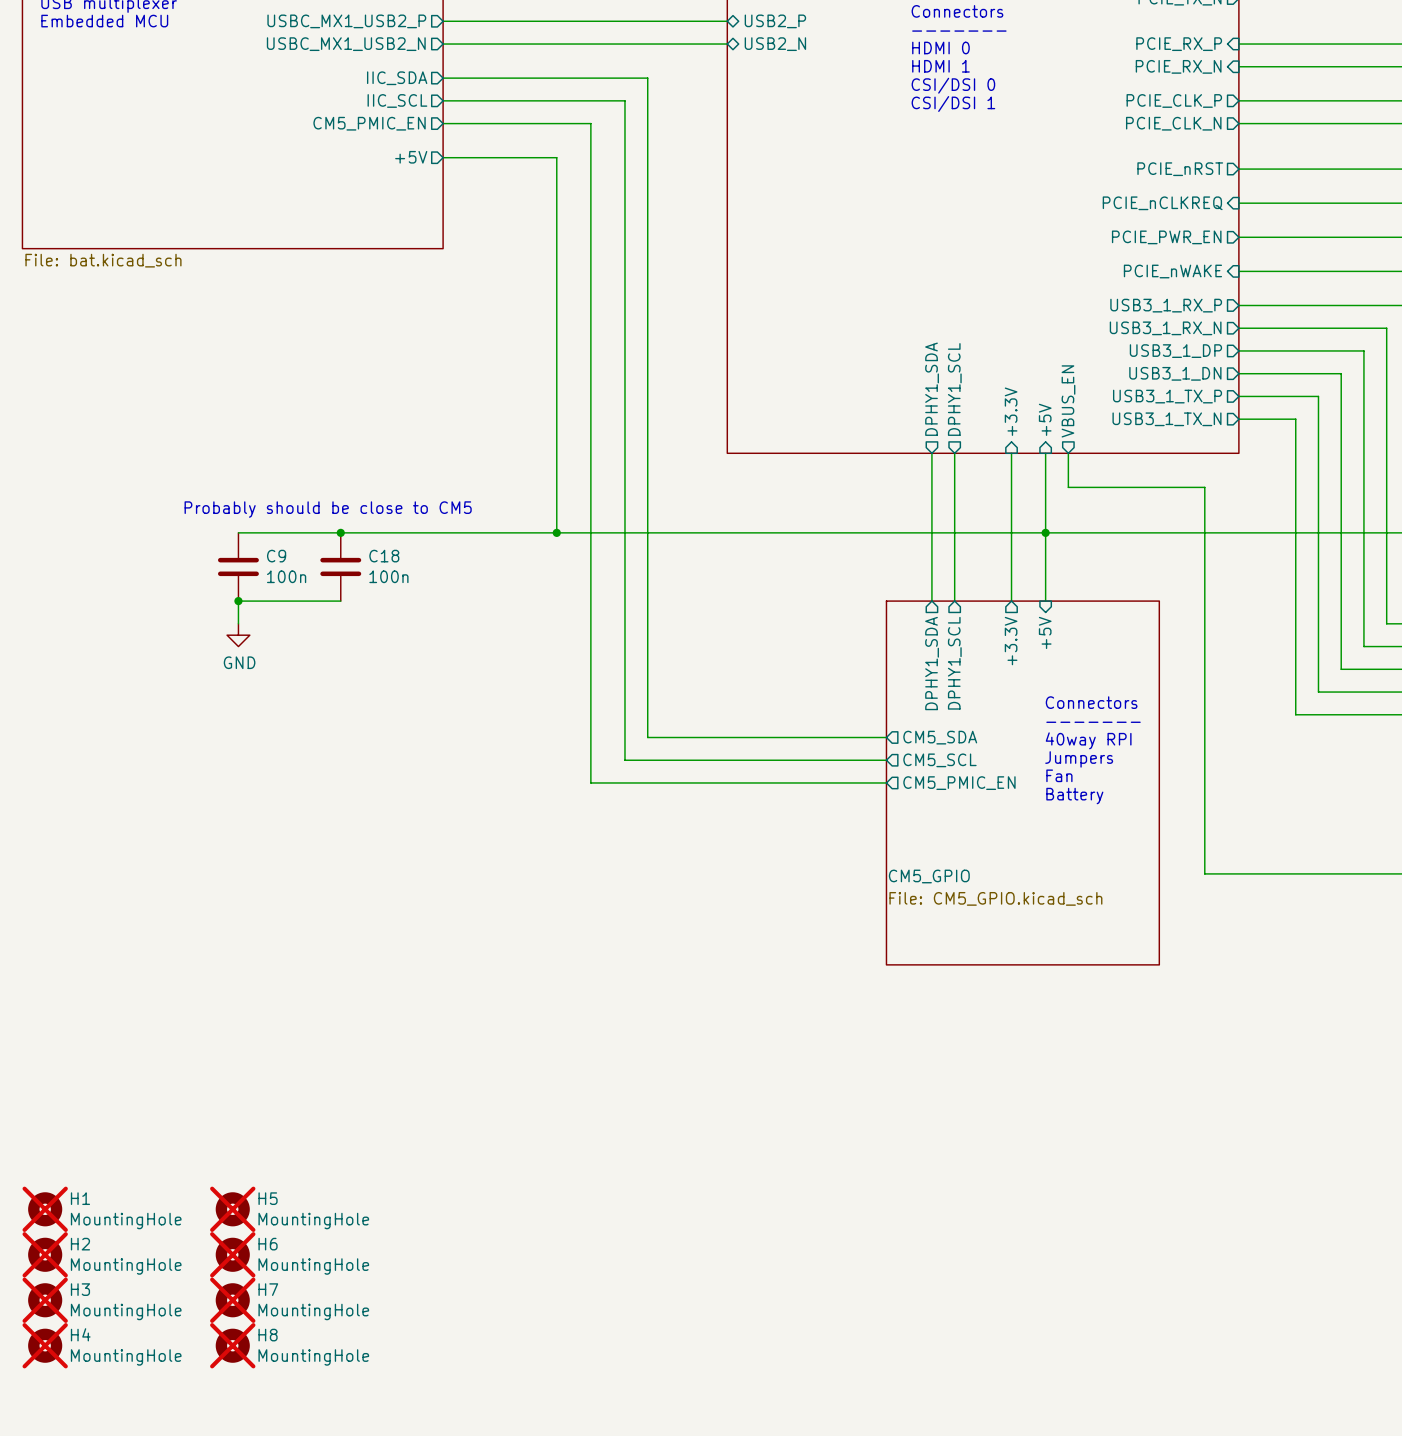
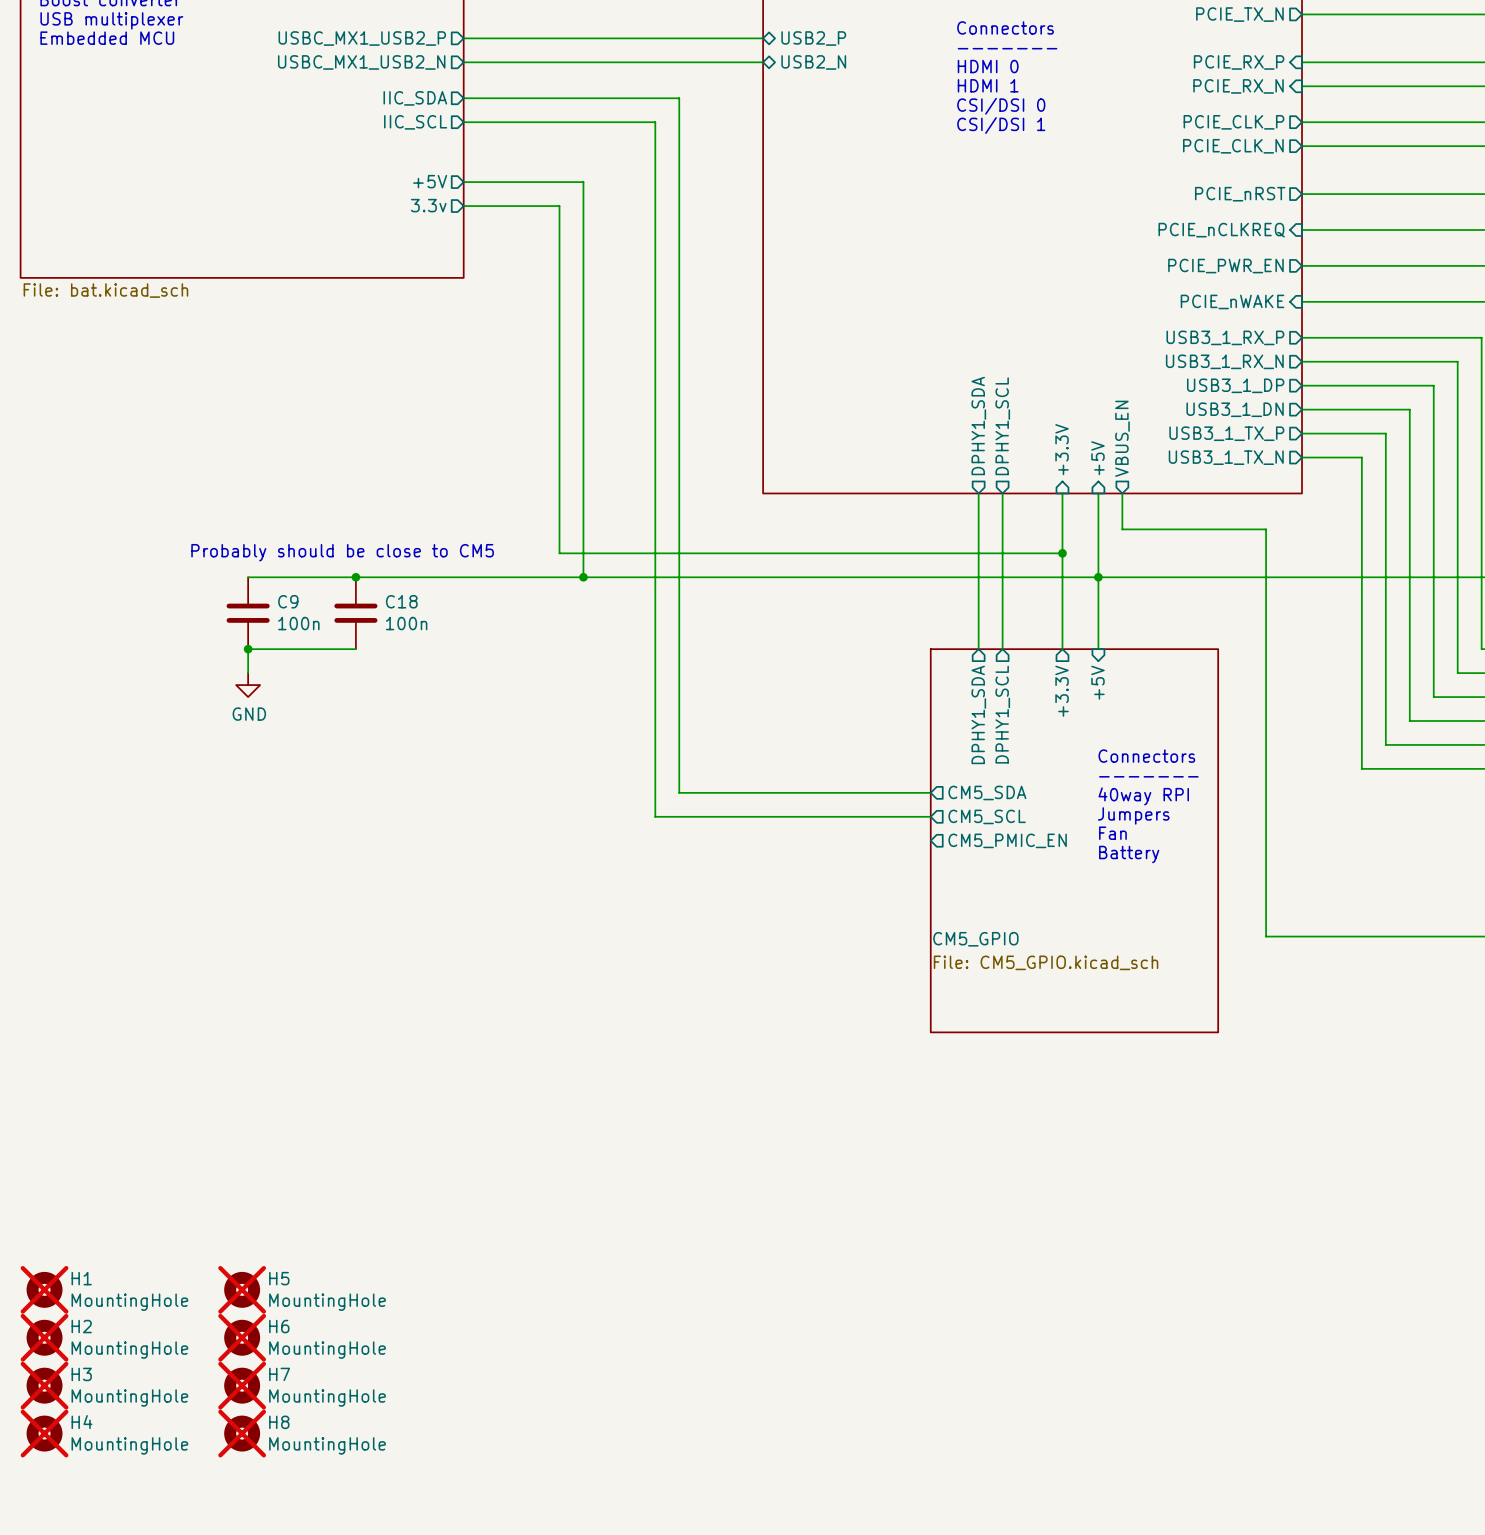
sheet pin: CM5_PMIC_EN (369, 123) -> none
wire: (443, 123) (590, 123) (590, 782) (886, 782) -> none
sheet pin: none -> 3.3v (428, 205)
wire: none -> (463, 206) (559, 206) (559, 553) (1062, 553)
junction: none -> (1062, 553)

